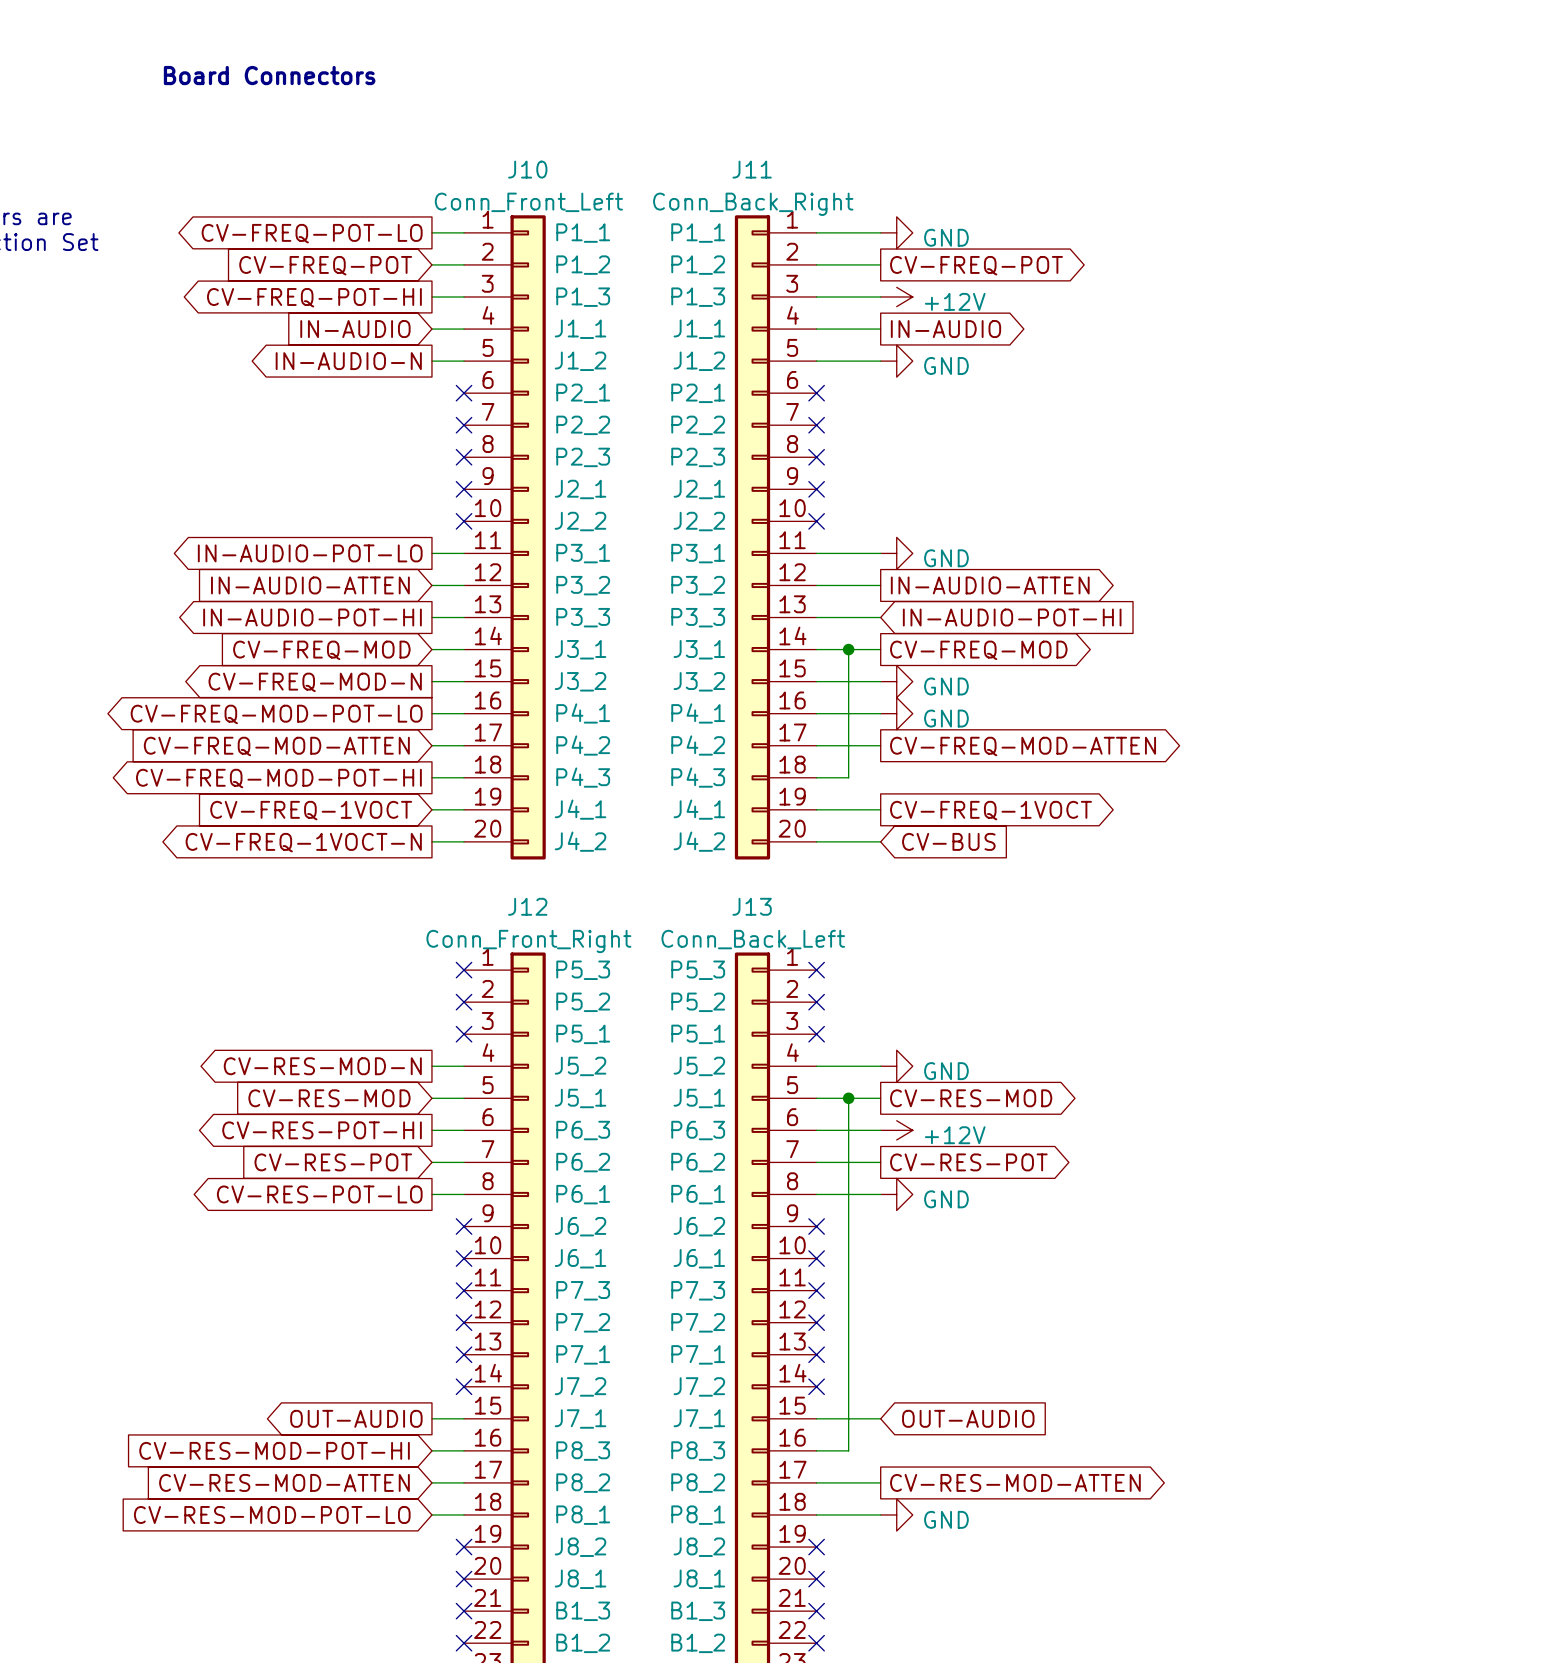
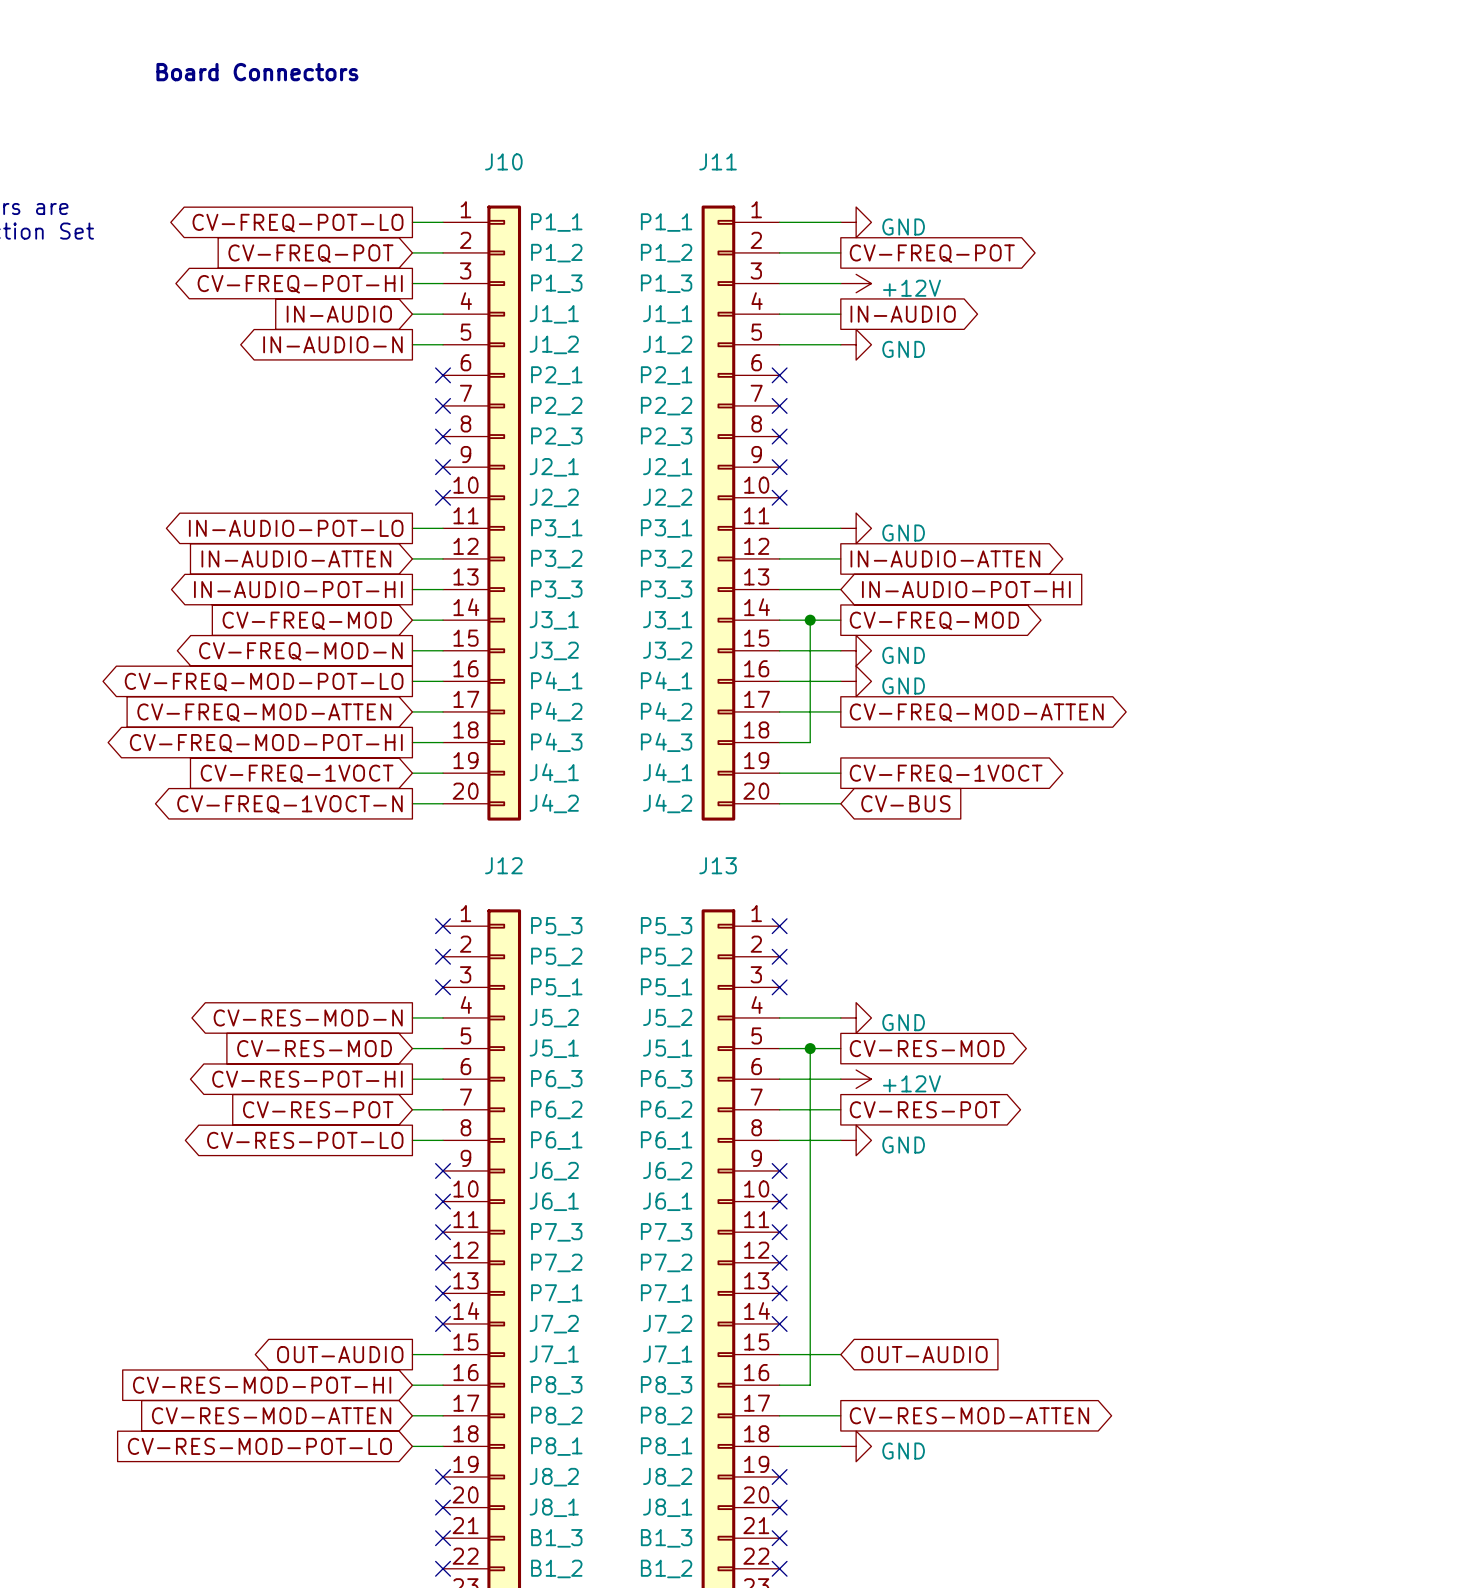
J10 value: Conn_Front_Left (528, 202) -> none
J11 value: Conn_Back_Right (753, 204) -> none
J13 value: Conn_Back_Left (753, 939) -> none
J12 value: Conn_Front_Right (528, 941) -> none

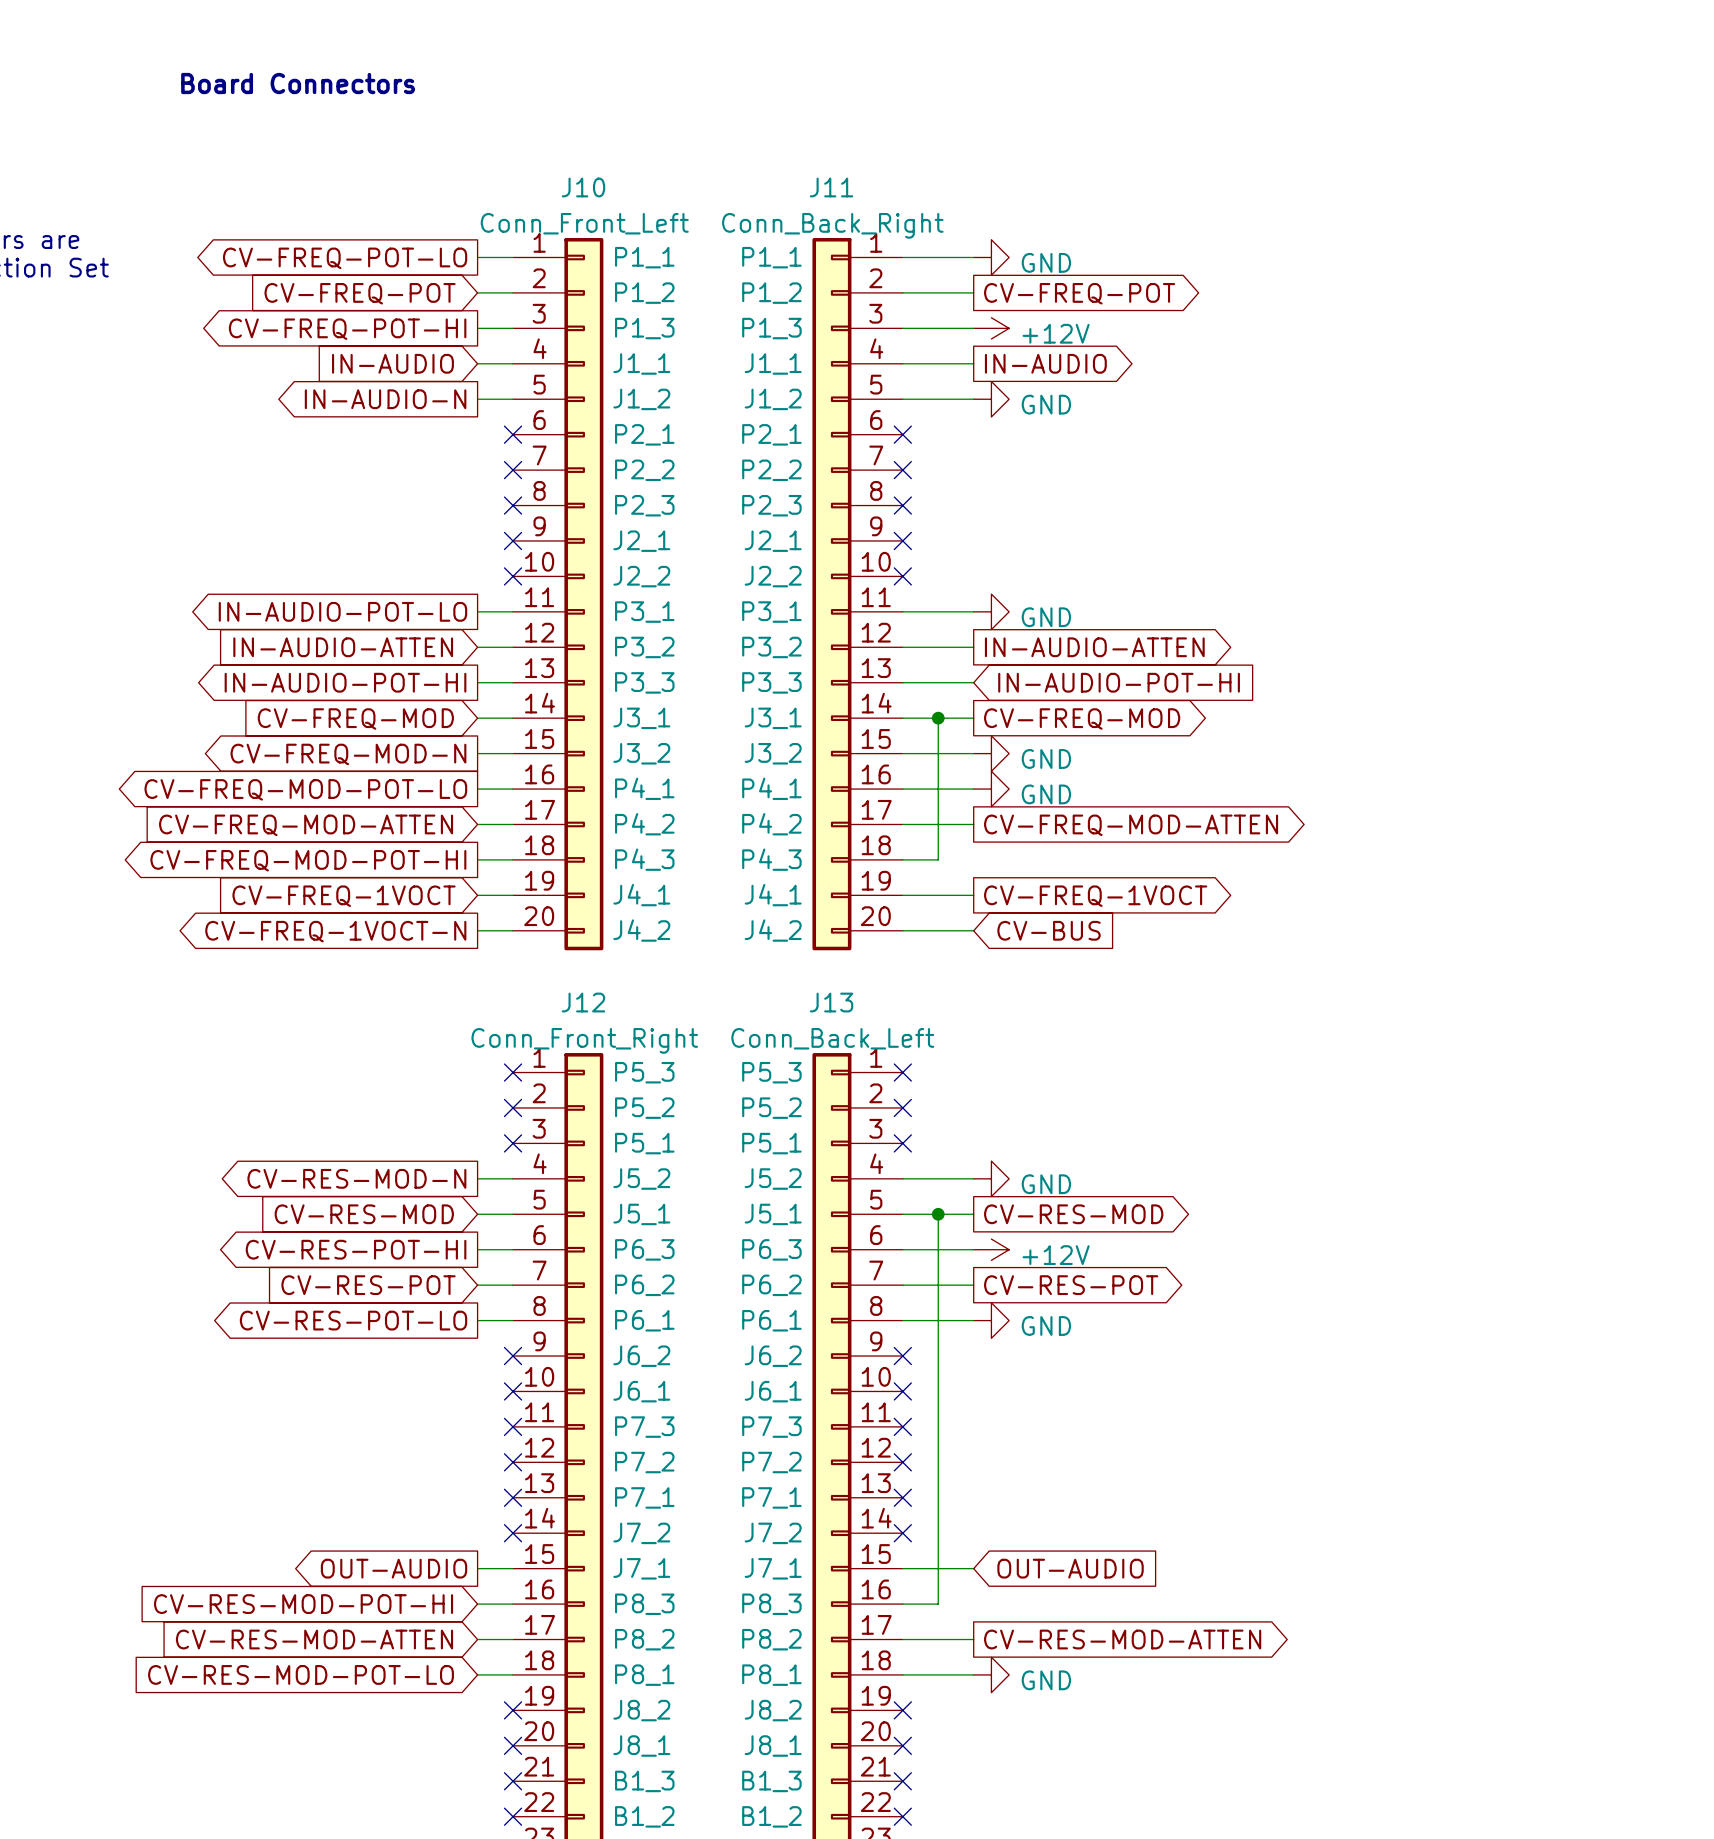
J10 value: none -> Conn_Front_Left (584, 223)
J11 value: none -> Conn_Back_Right (832, 225)
J13 value: none -> Conn_Back_Left (832, 1038)
J12 value: none -> Conn_Front_Right (584, 1040)

